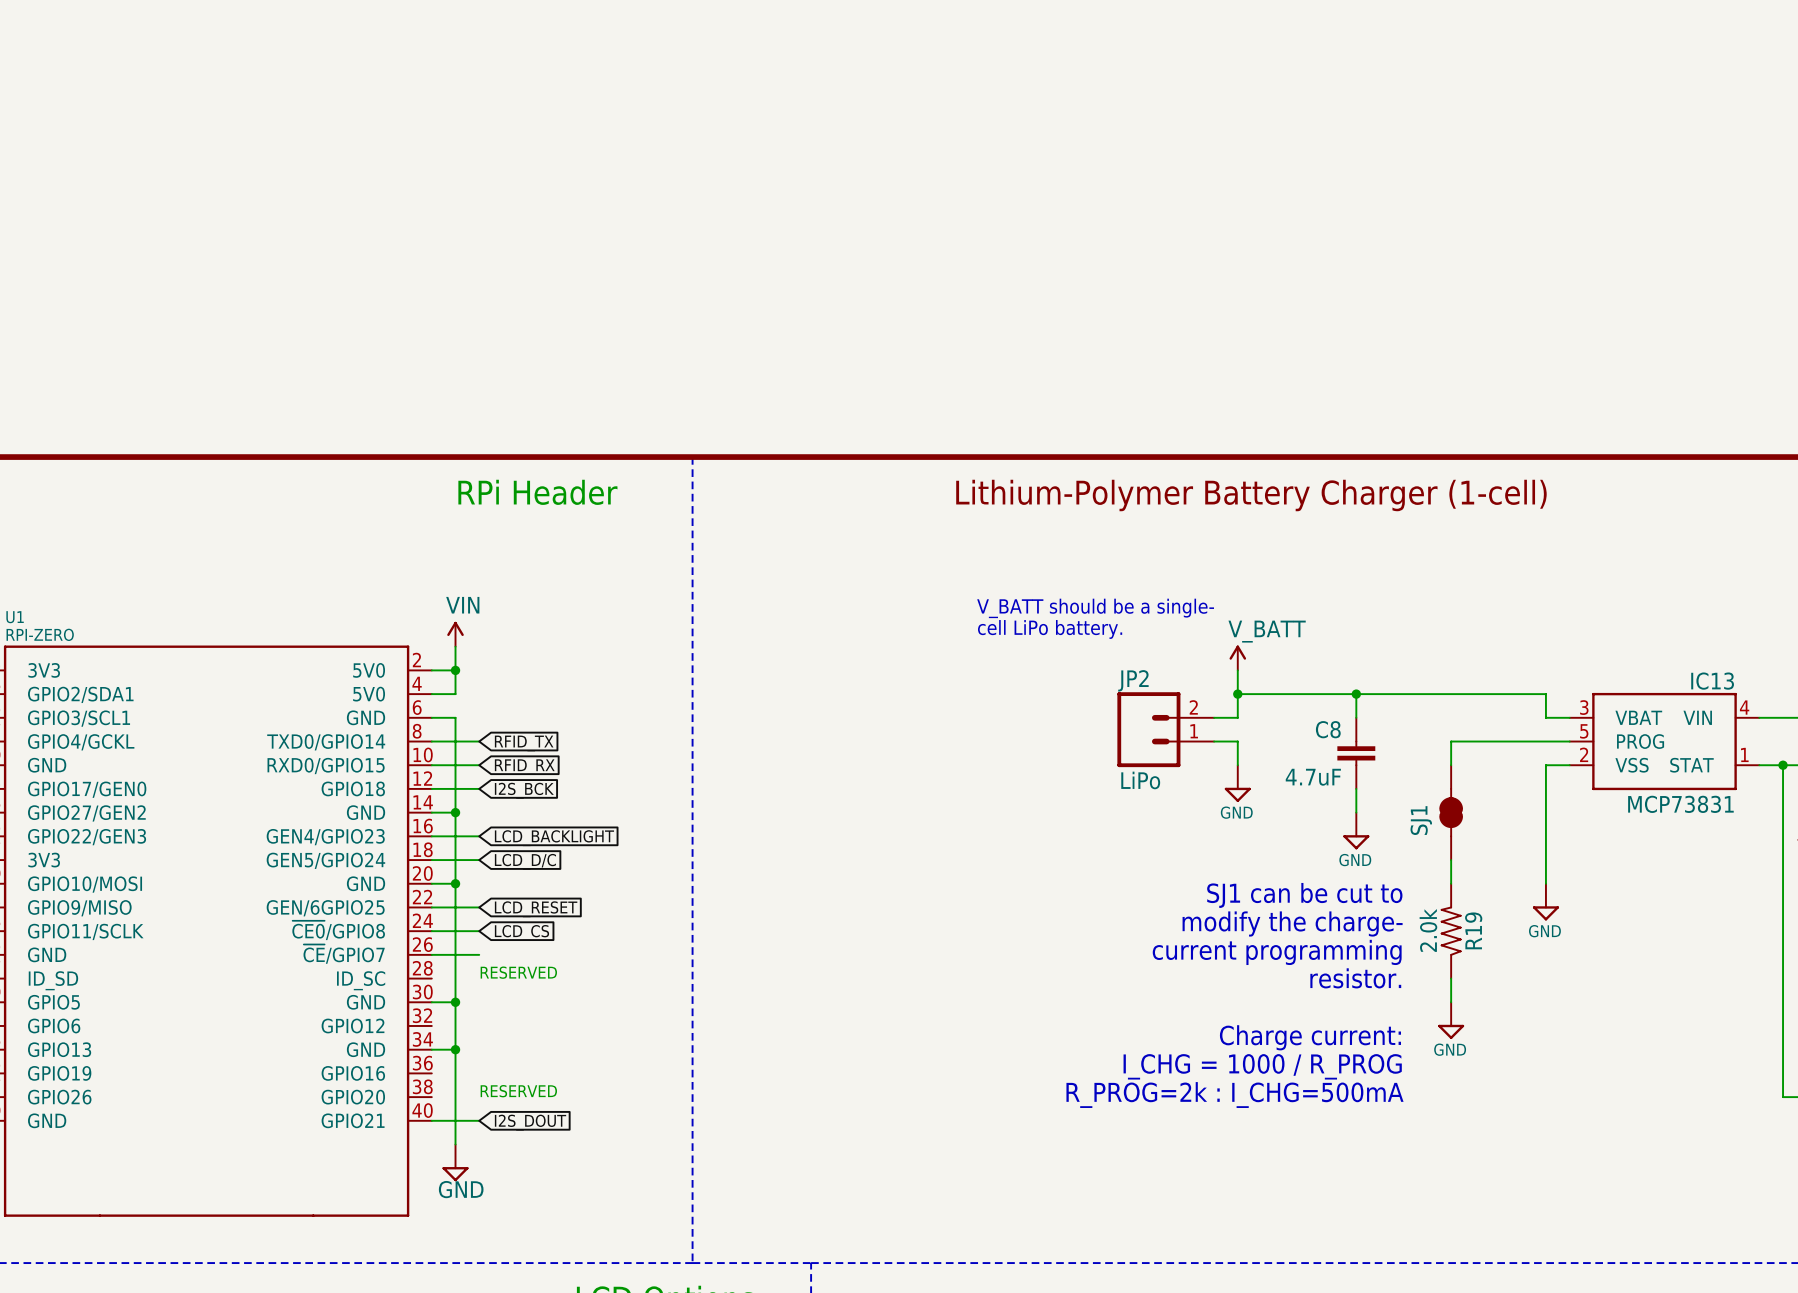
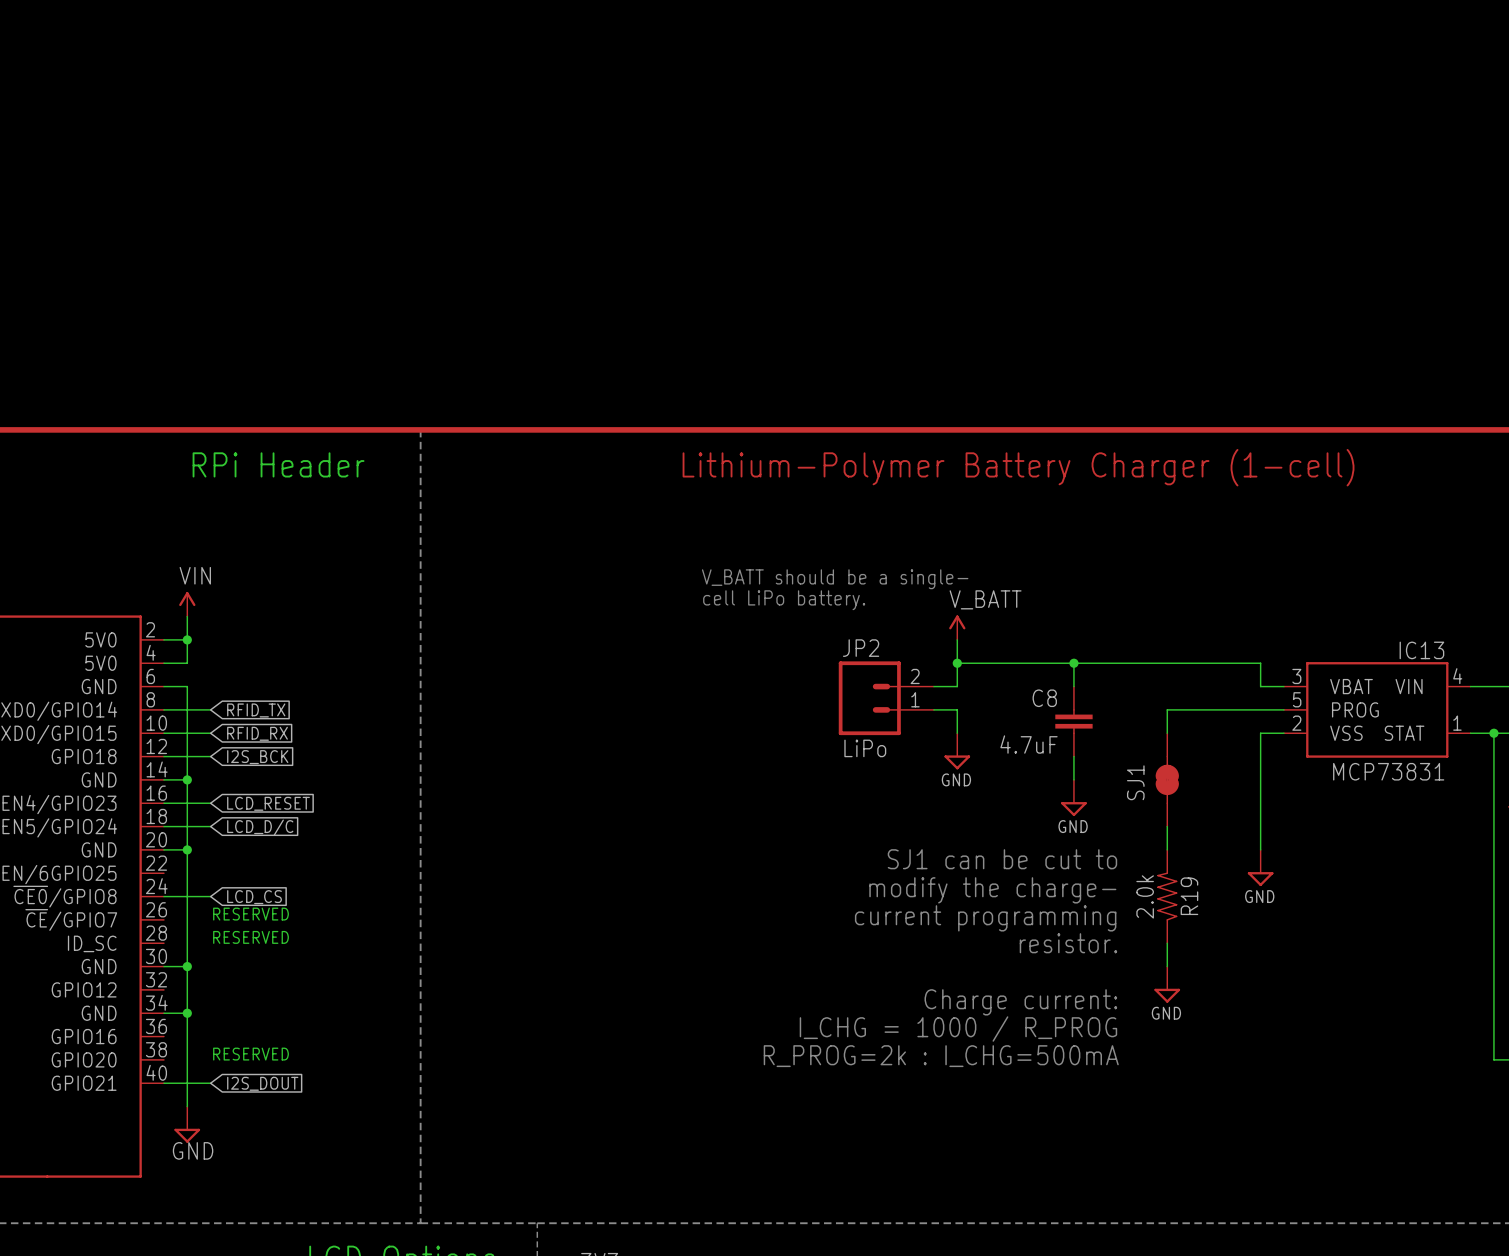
global label: LCD_BACKLIGHT (554, 838) -> LCD_RESET (268, 803)
wire: (431, 907) (479, 907) -> none
global label: LCD_RESET (536, 909) -> none
text: none -> RESERVED (251, 914)
wire: (431, 954) (479, 954) -> none

